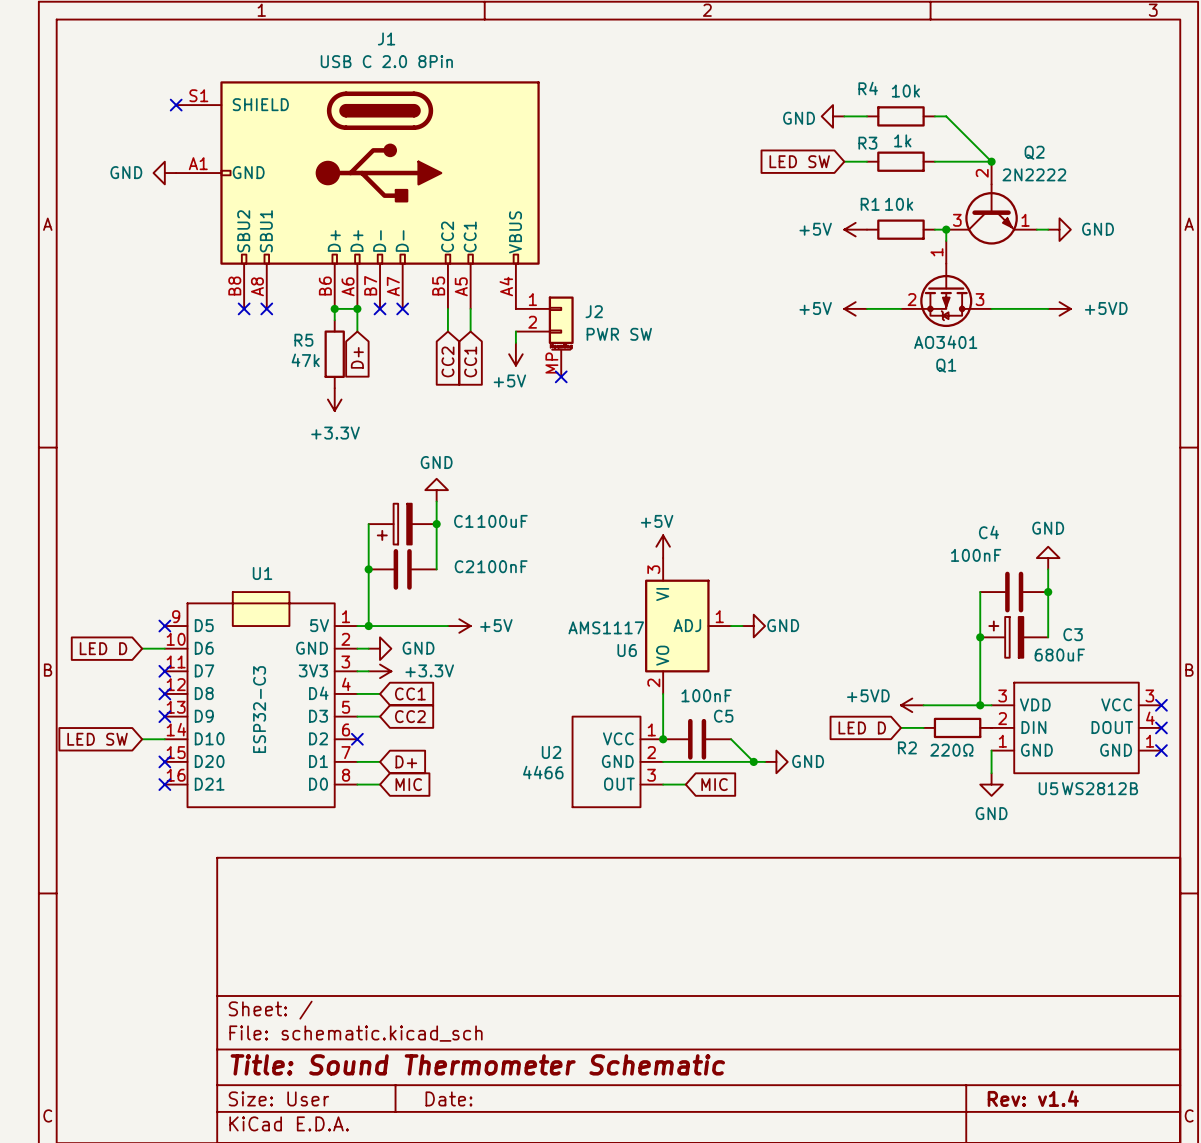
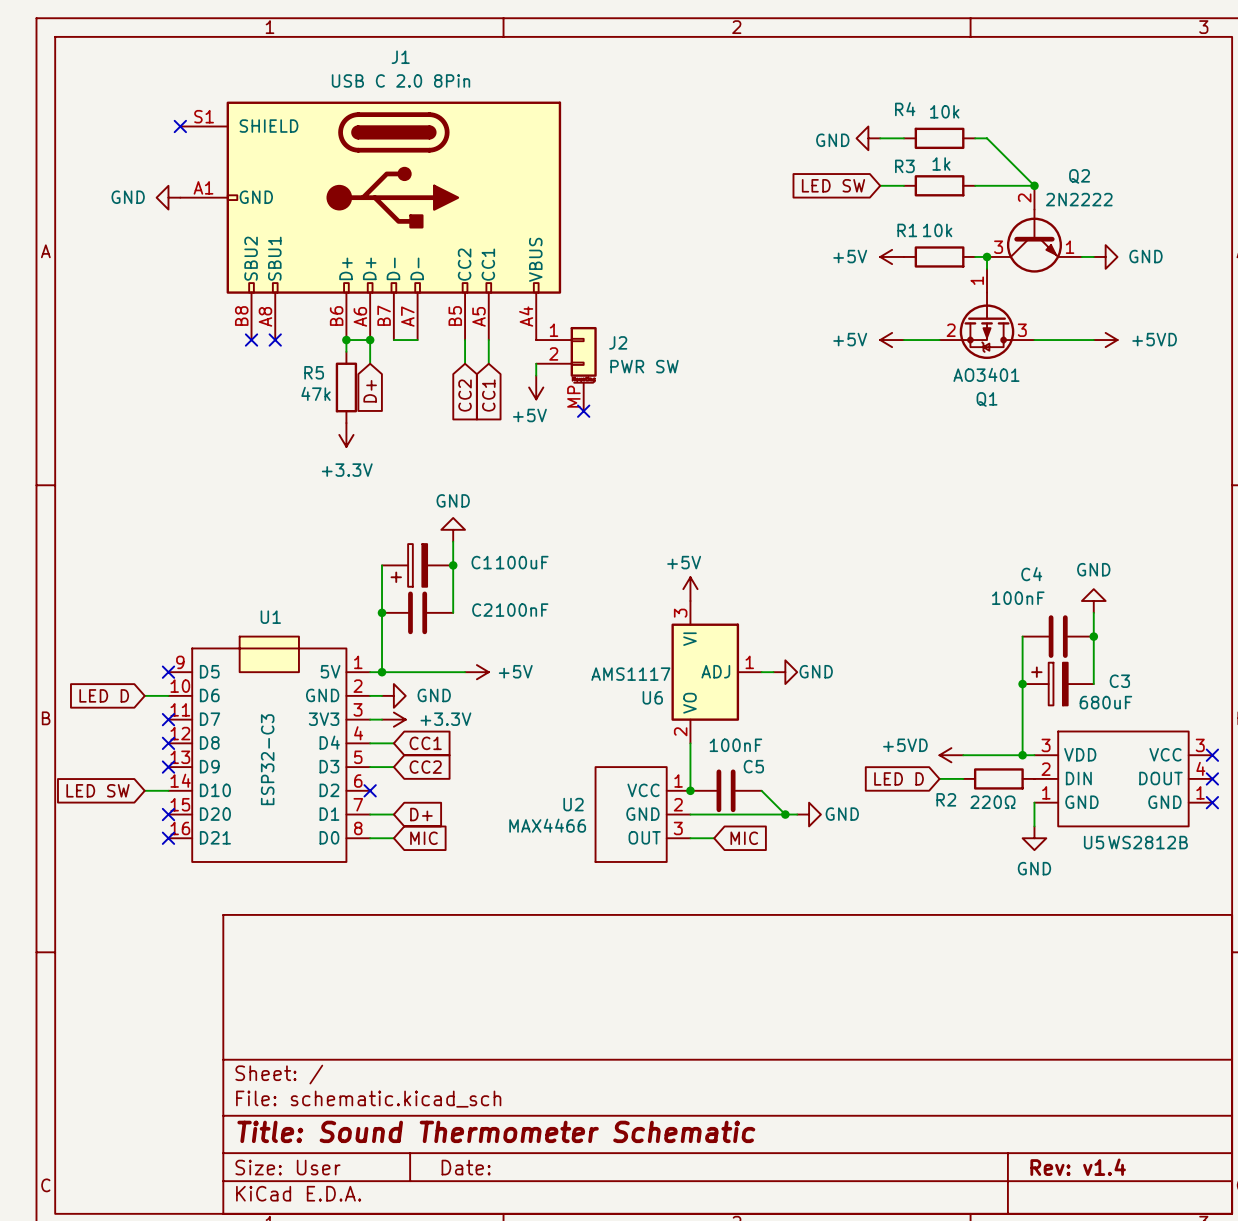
wire: none -> (393, 340) (417, 340)
no-connect mark: (380, 308) -> none
no-connect mark: (402, 308) -> none
U2 value: 4466 (543, 772) -> MAX4466 (547, 825)

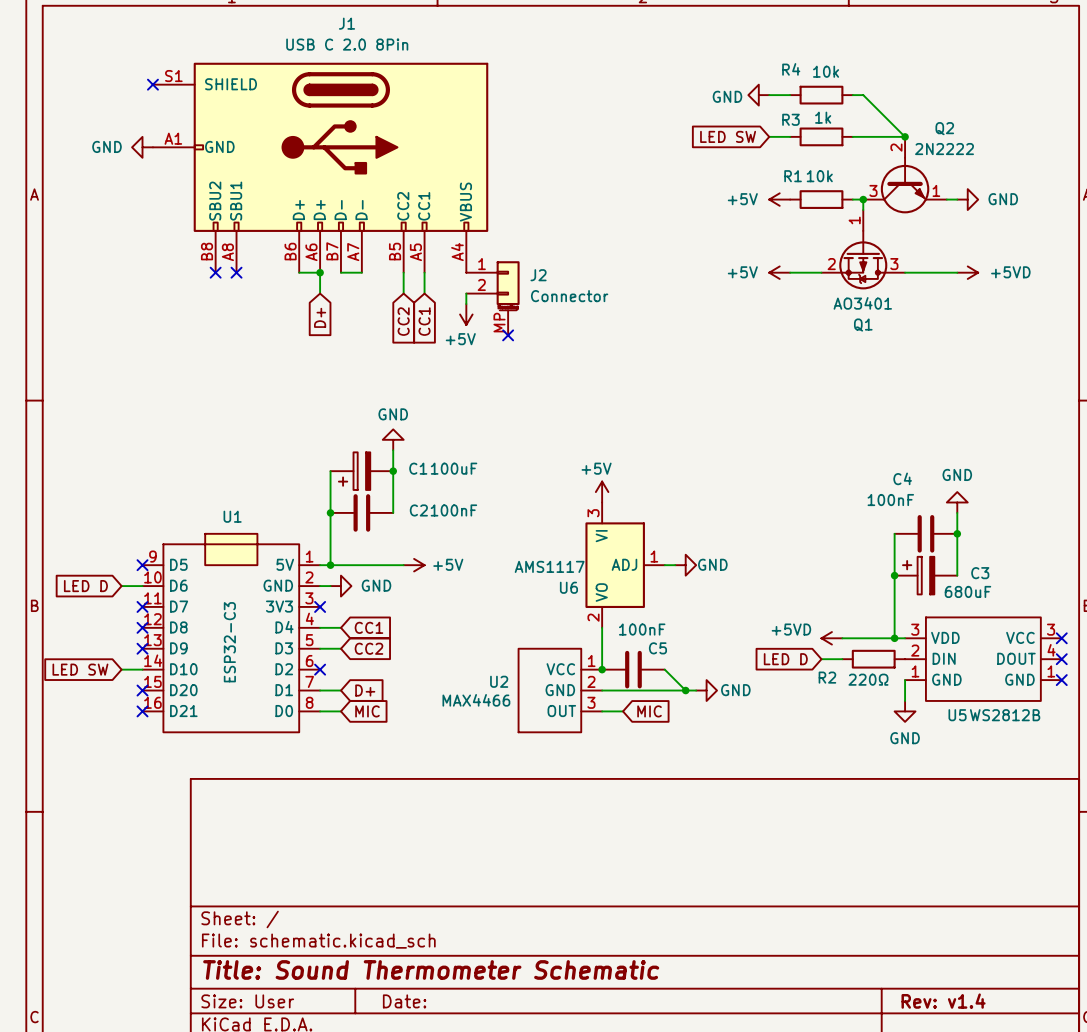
wire: (346, 340) (346, 351) -> none
junction: (346, 340) -> none
J2 value: PWR SW (644, 366) -> Connector (569, 296)
R5: 47k (346, 387) -> none
power symbol: +3.3V (346, 434) -> none
wire: (370, 719) (382, 719) -> none
no-connect mark: none -> (320, 606)
power symbol: +3.3V (393, 719) -> none

